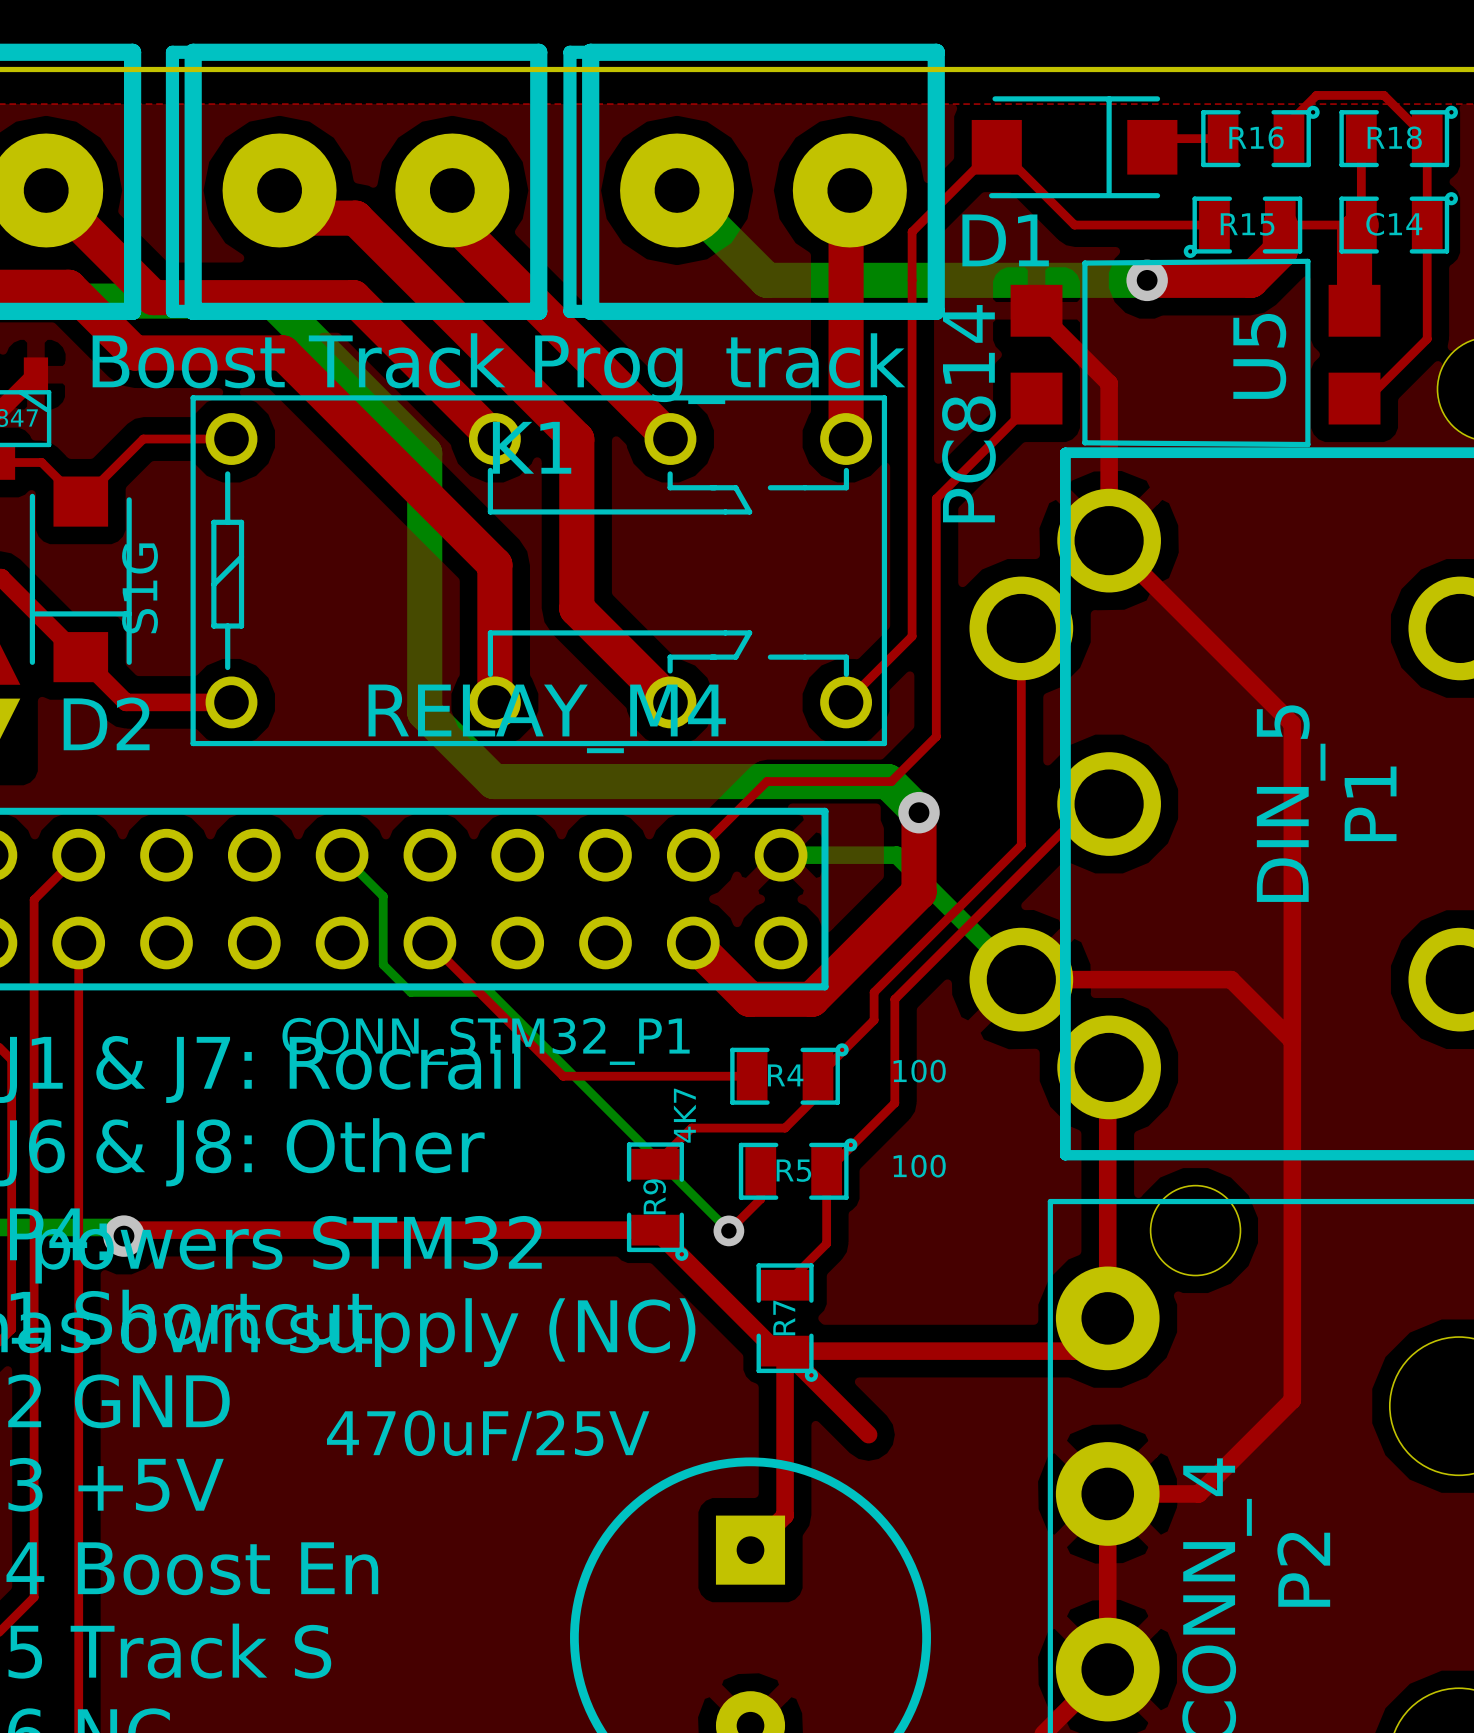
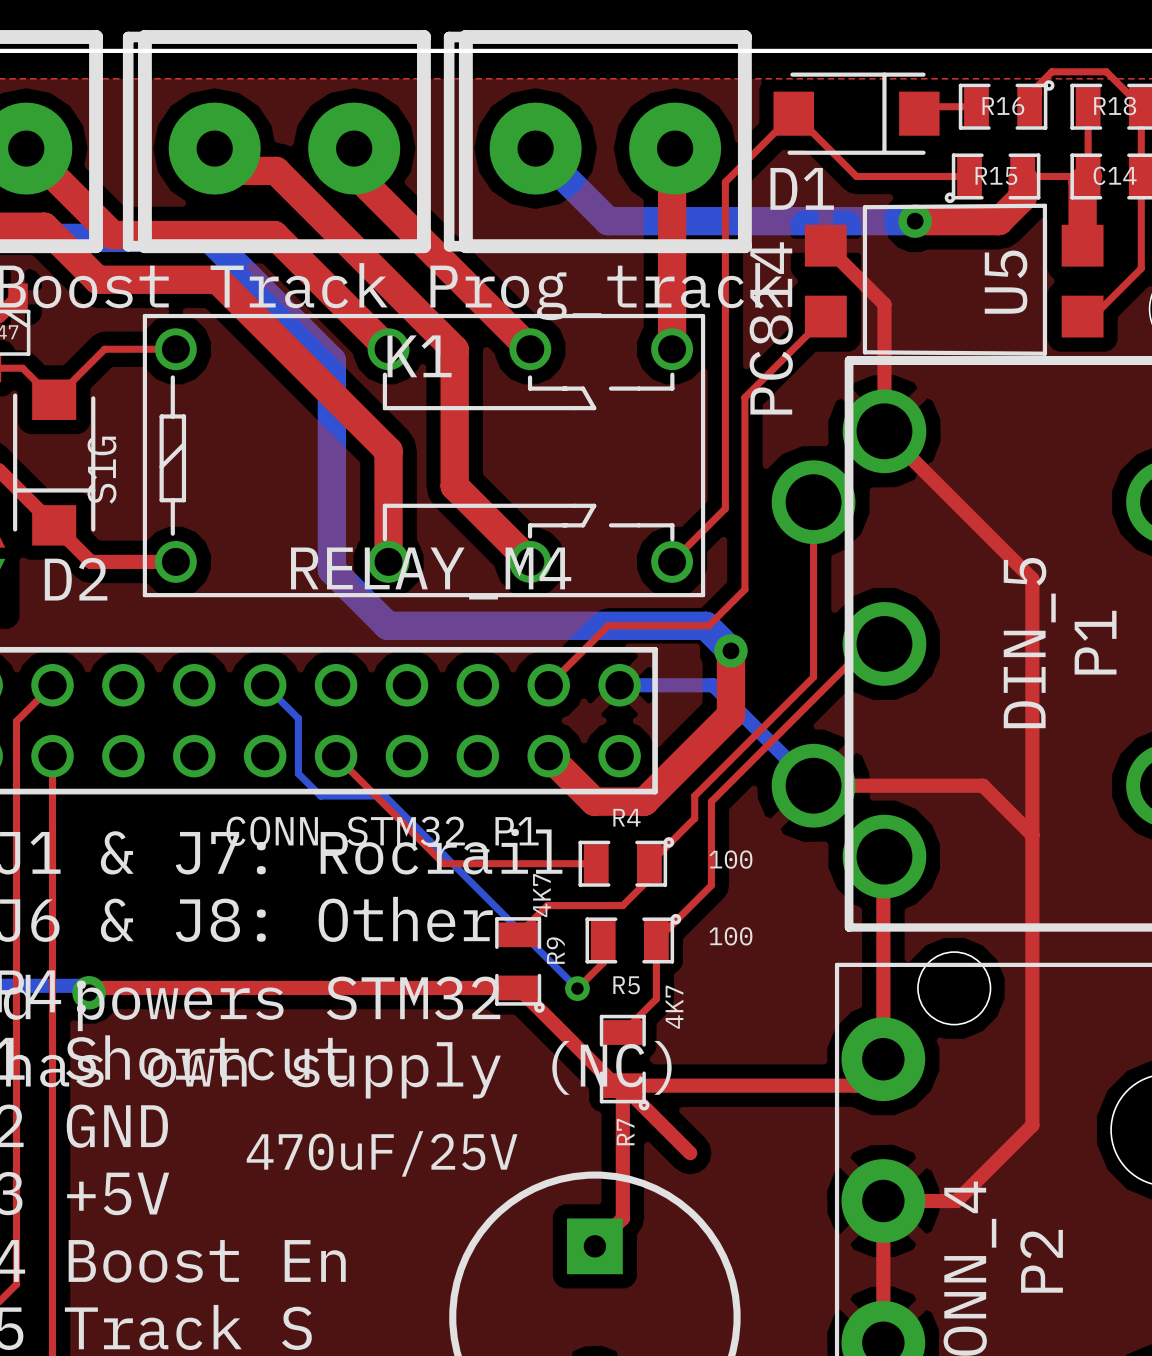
R4 name position: R4 (785, 1075) -> R4 (626, 817)
R5 name position: R5 (793, 1170) -> R5 (626, 985)
R9 name position: R9 (654, 1196) -> R9 (555, 950)
R7 value: none -> 4K7 (674, 1007)
R7 name position: R7 (784, 1318) -> R7 (625, 1132)

